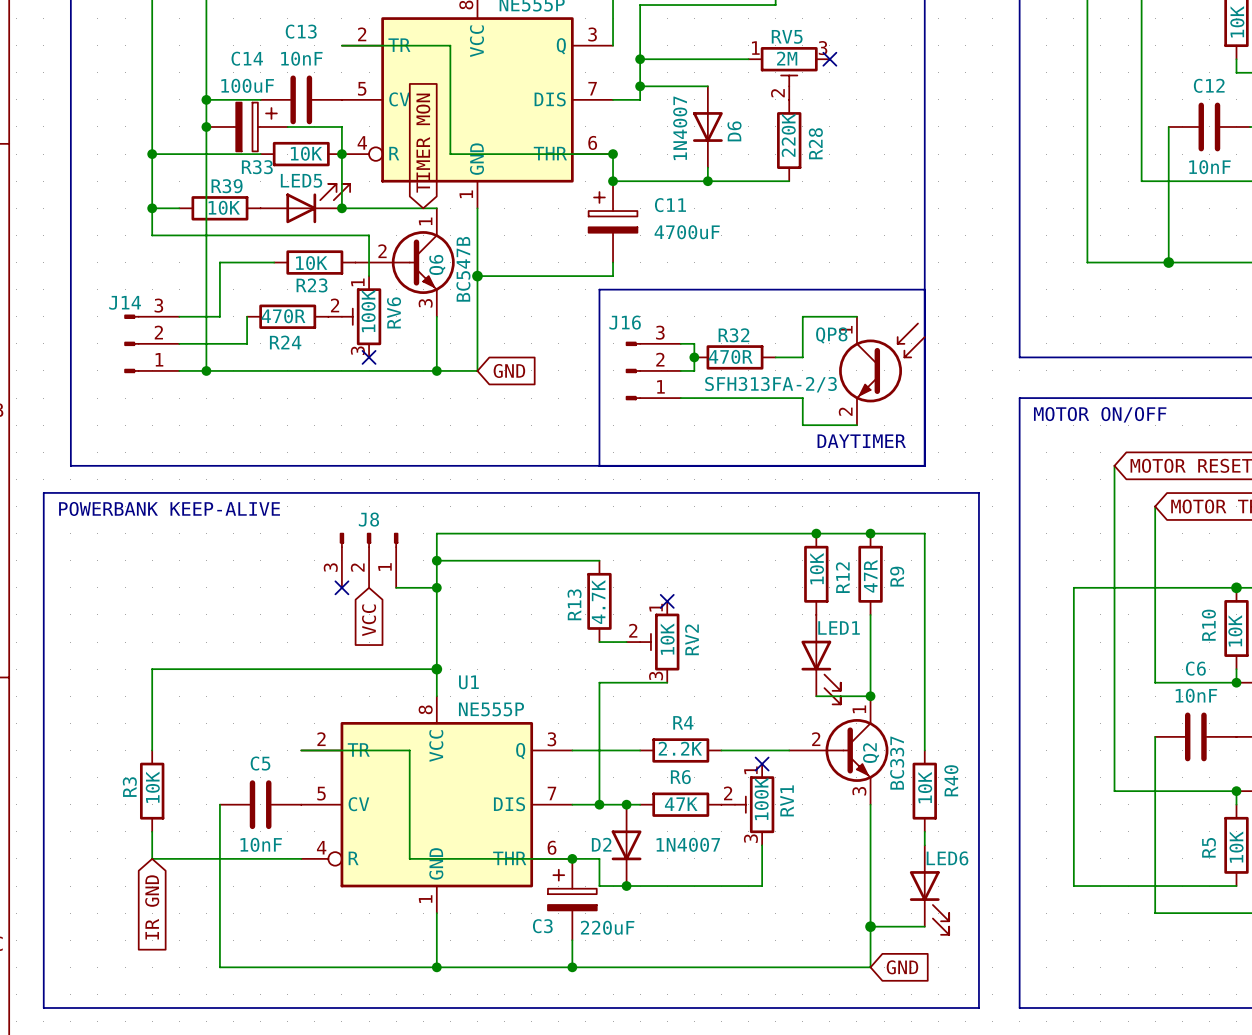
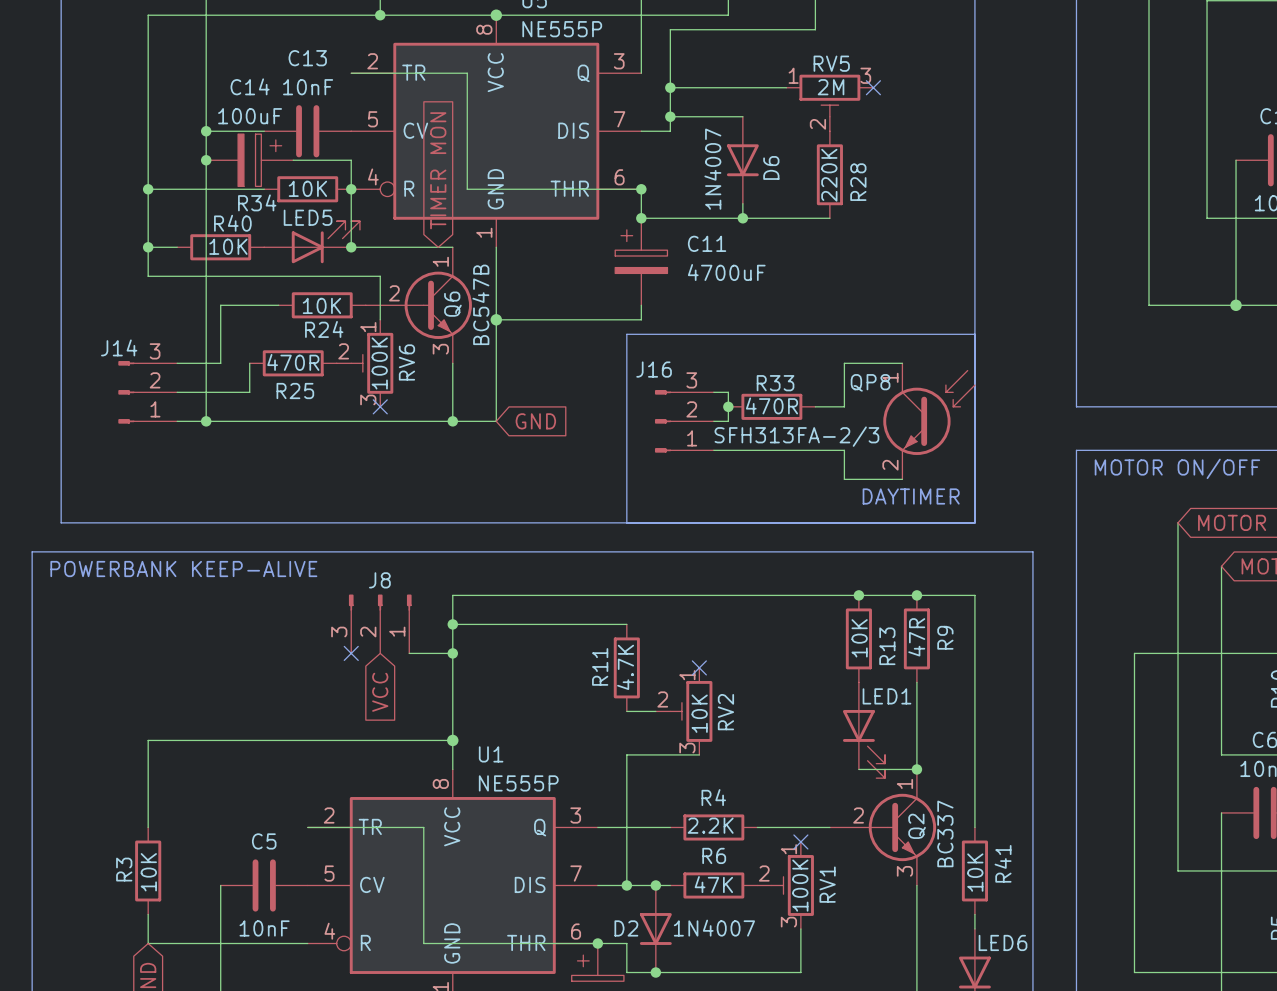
R33 name: R33 (257, 167) -> R34 (257, 202)
R39 name: R39 (227, 186) -> R40 (232, 223)
R23 name: R23 (312, 285) -> R24 (324, 329)
R32 name: R32 (733, 335) -> R33 (775, 383)
R24 name: R24 (285, 342) -> R25 (295, 391)
R12 name: R12 (842, 577) -> R13 (887, 646)
R13 name: R13 (574, 604) -> R11 (600, 666)
R40 name: R40 (951, 780) -> R41 (1003, 863)

